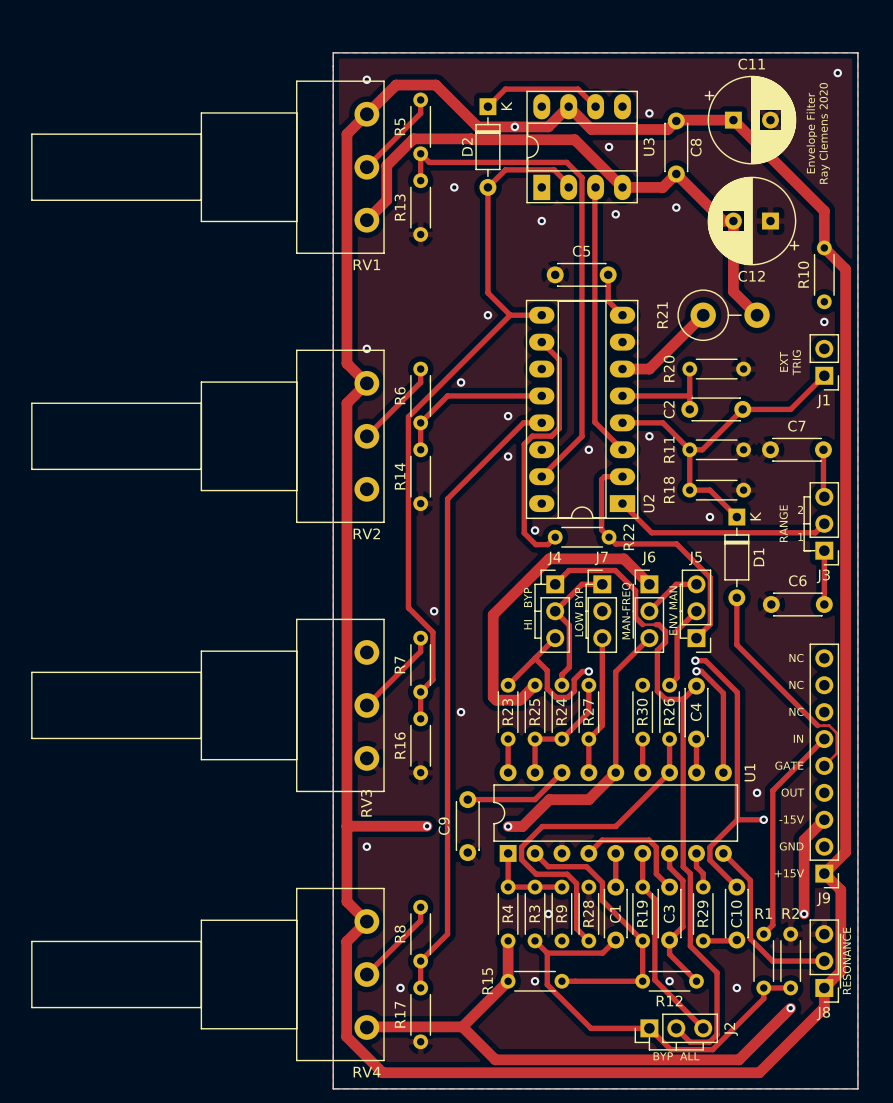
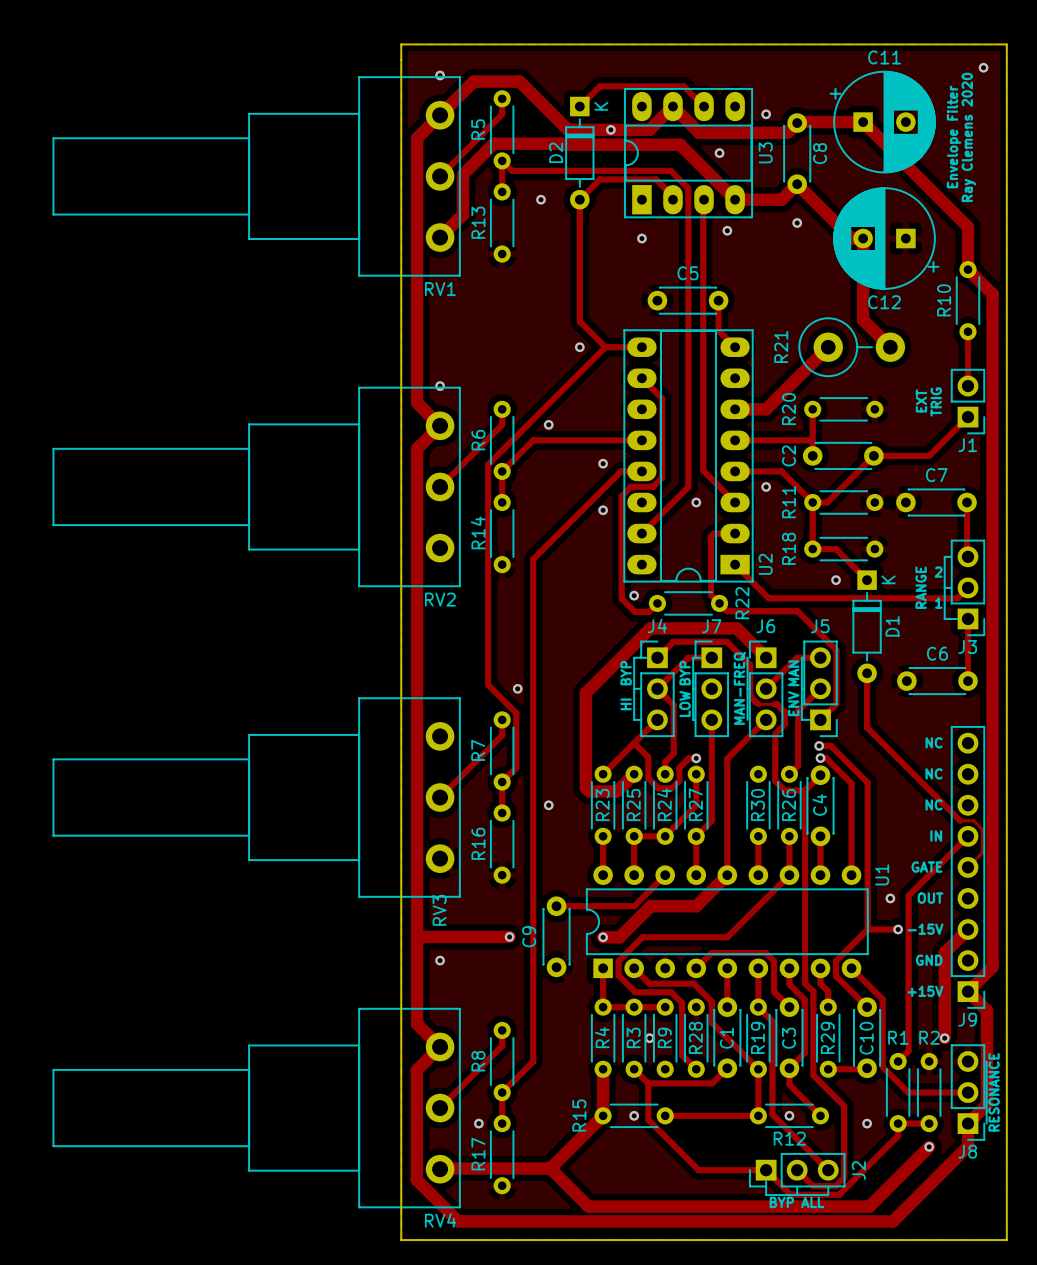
track: none -> (968, 331) (968, 386)
via: (824, 321) -> none

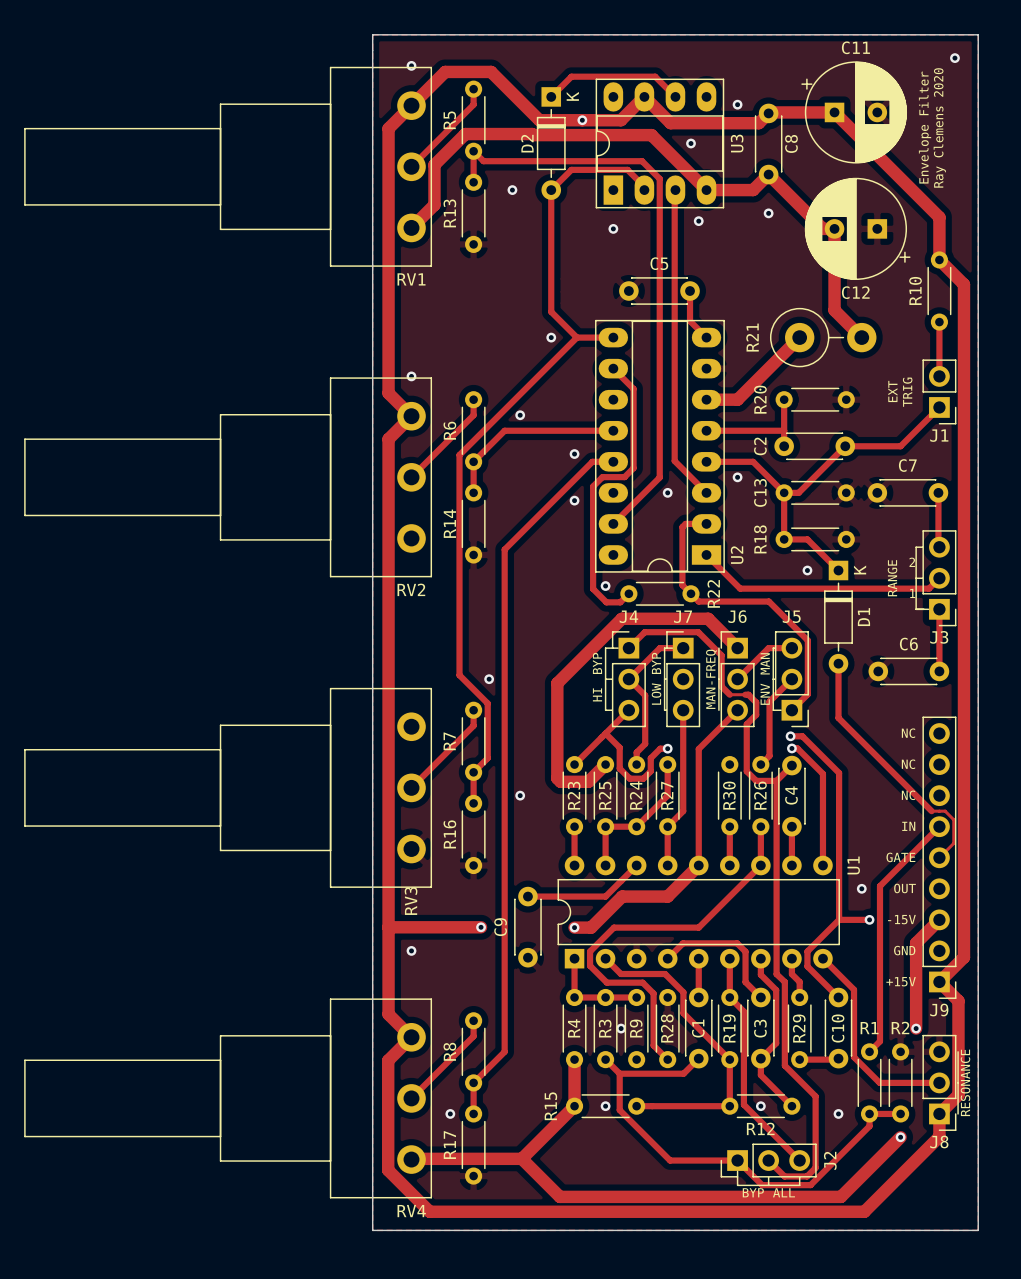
R11 name: R11 (788, 502) -> C13 (760, 492)

